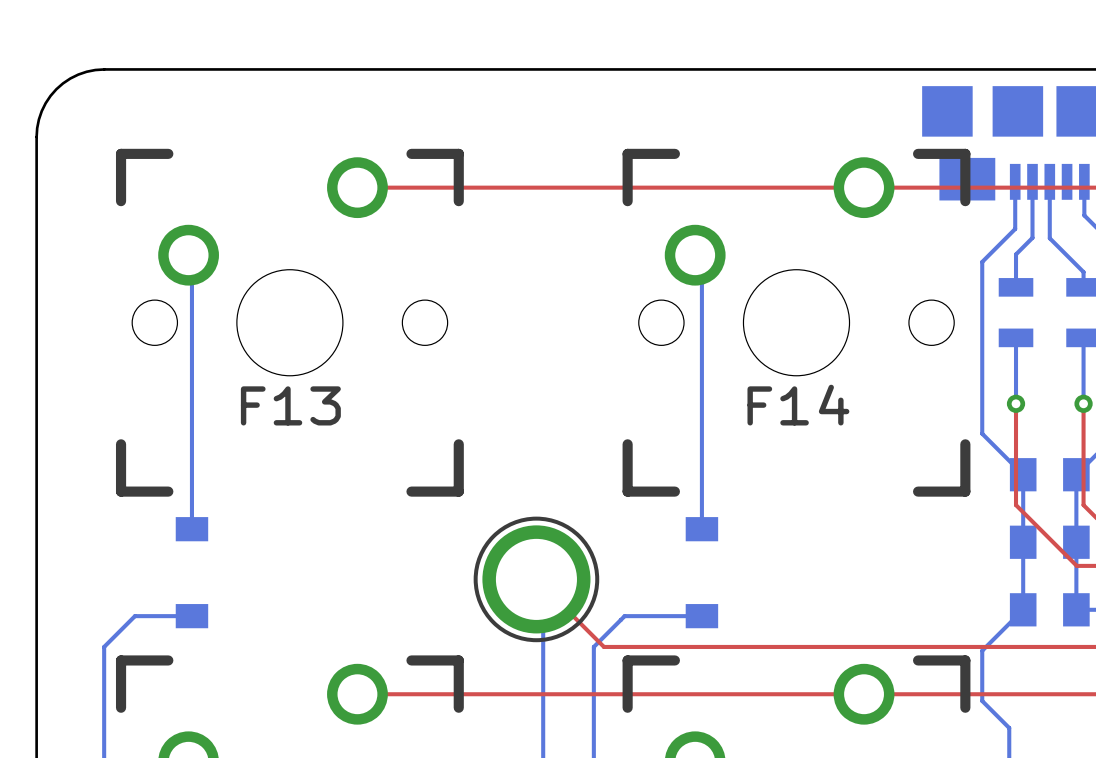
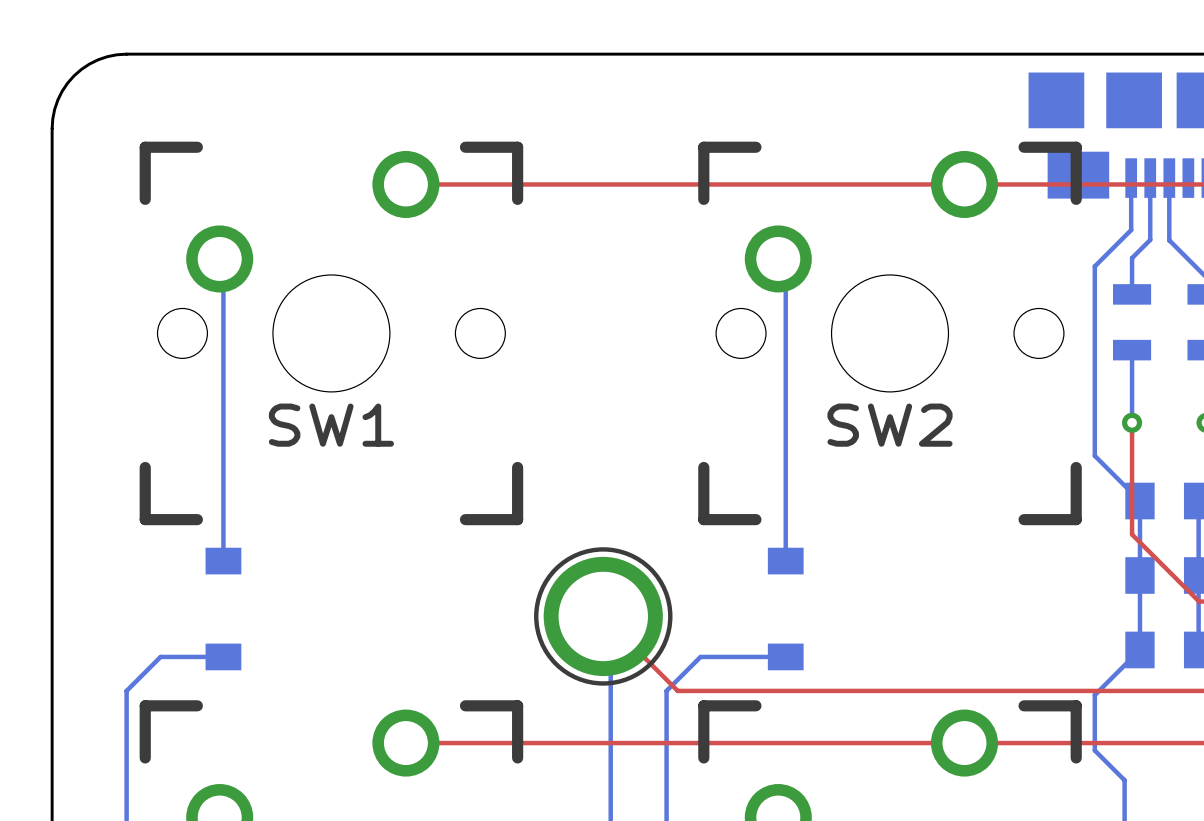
SW1 name: none -> SW1 (331, 425)
SW1 value: F13 (290, 405) -> none
SW2 name: none -> SW2 (890, 425)
SW2 value: F14 (798, 405) -> none

